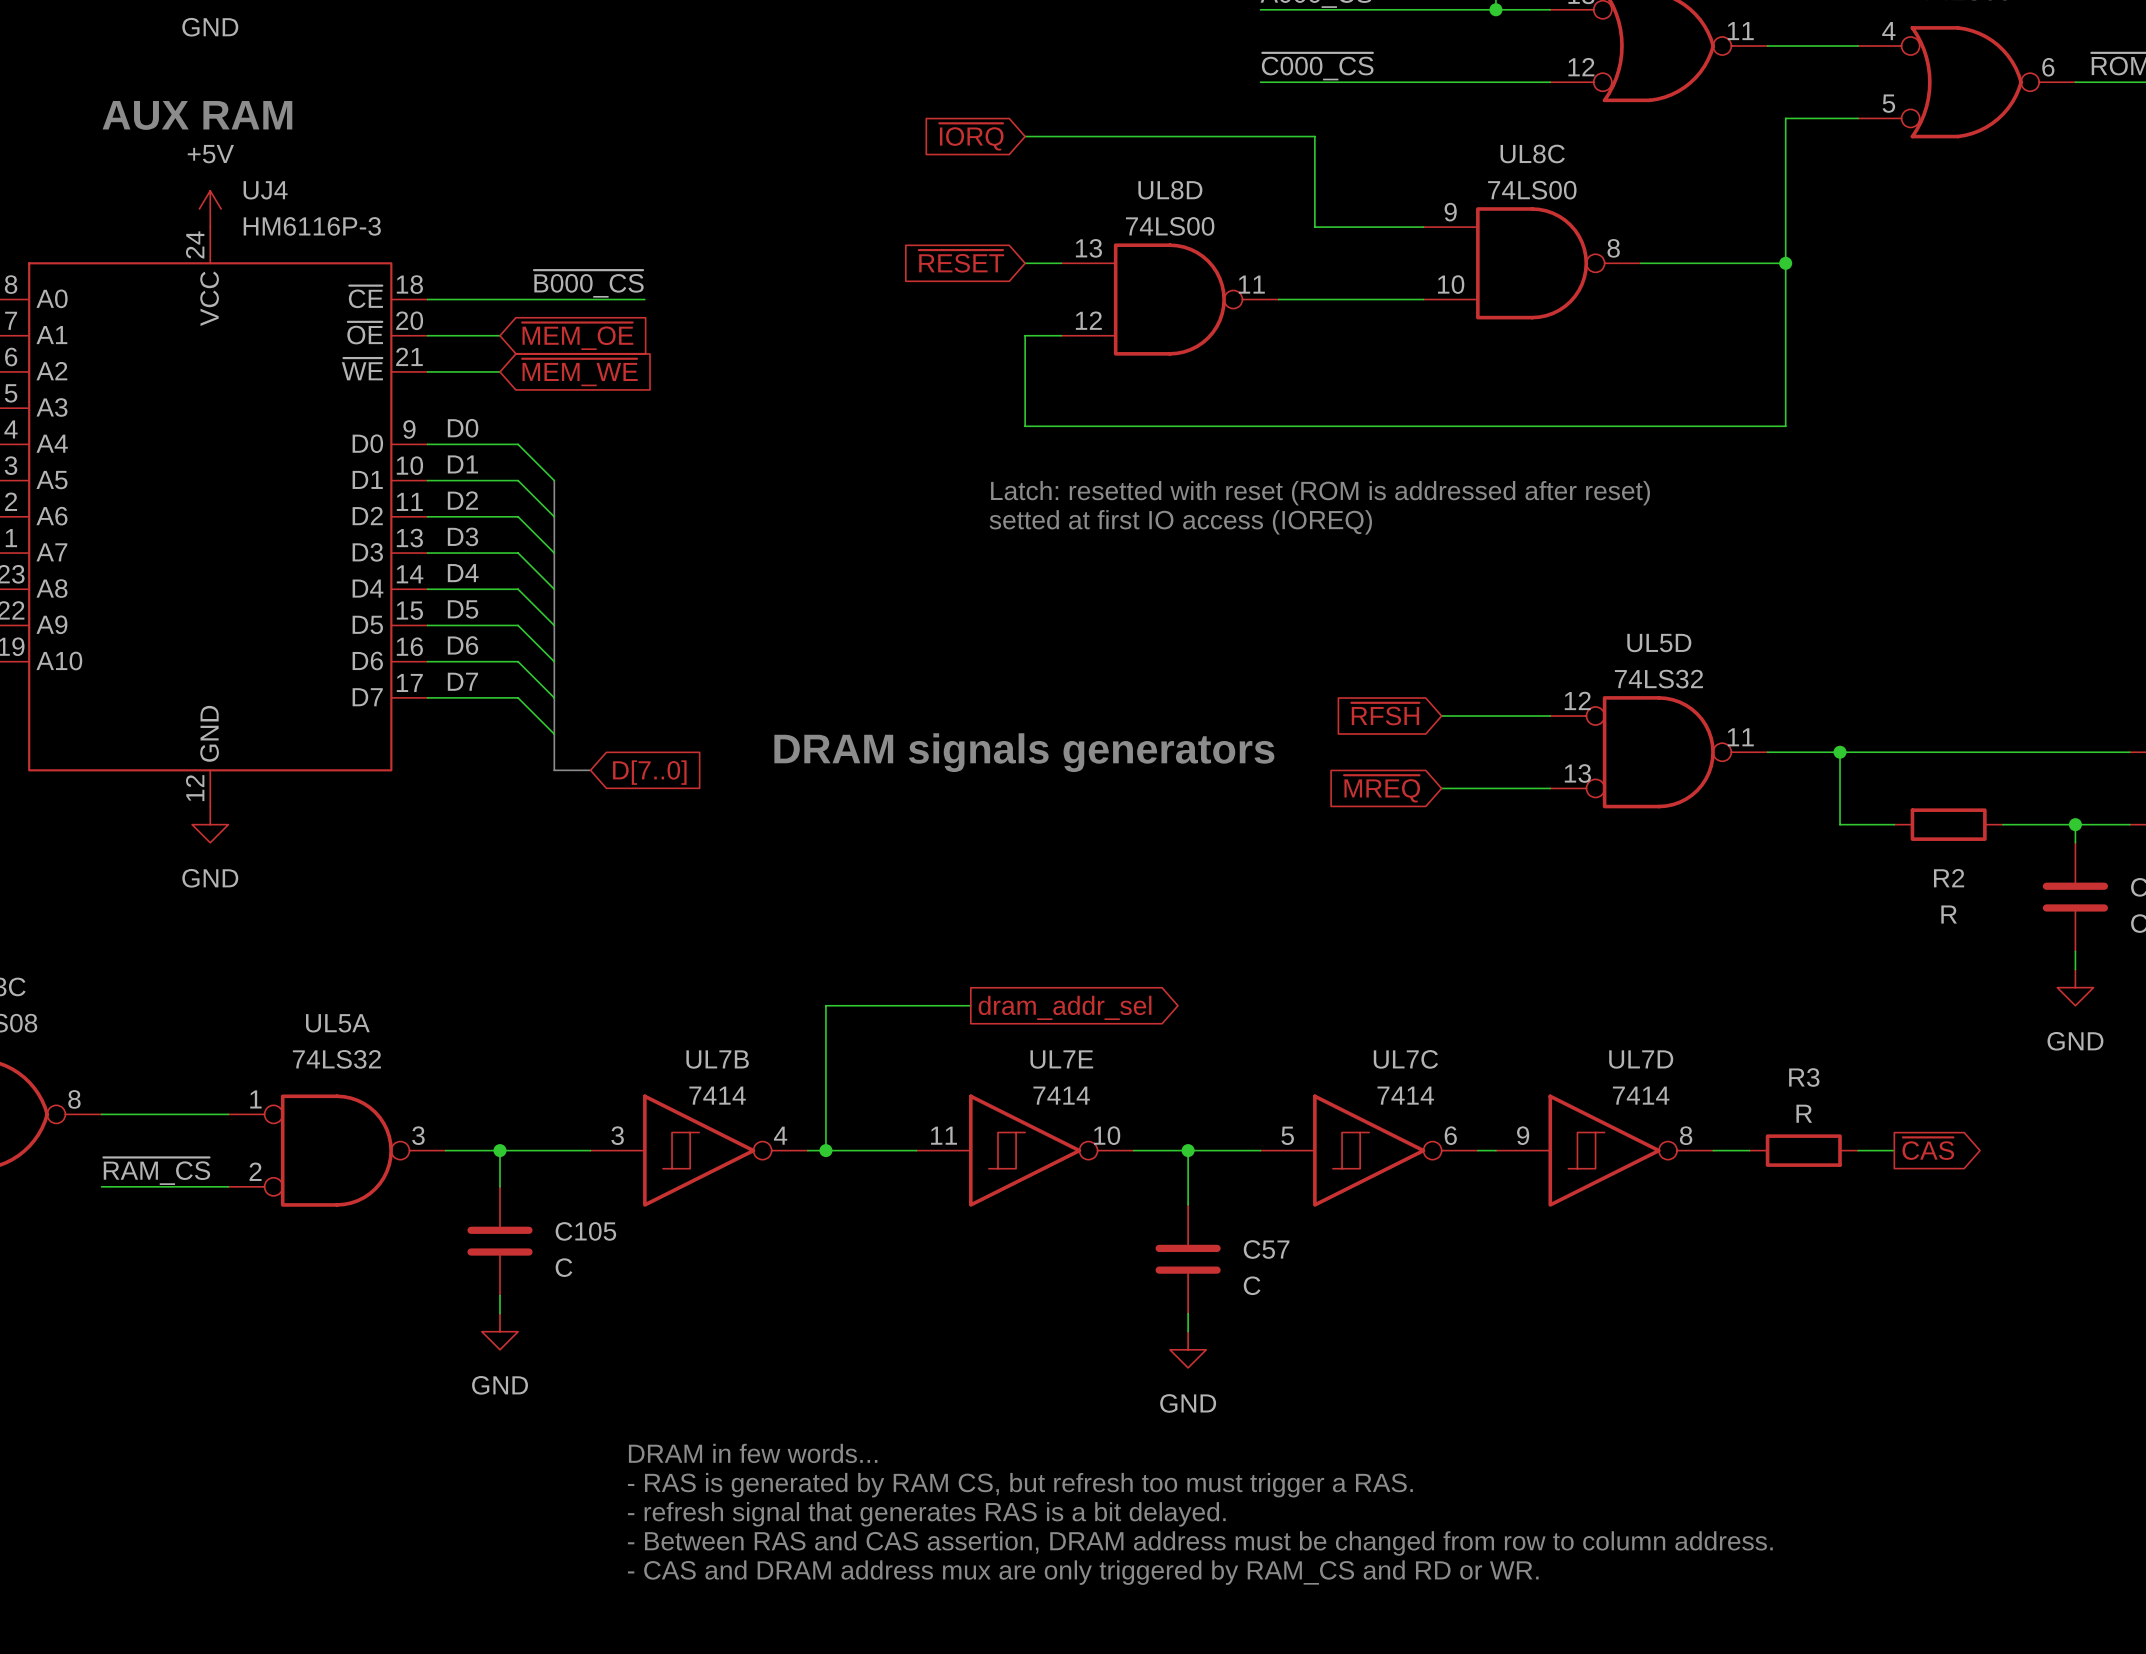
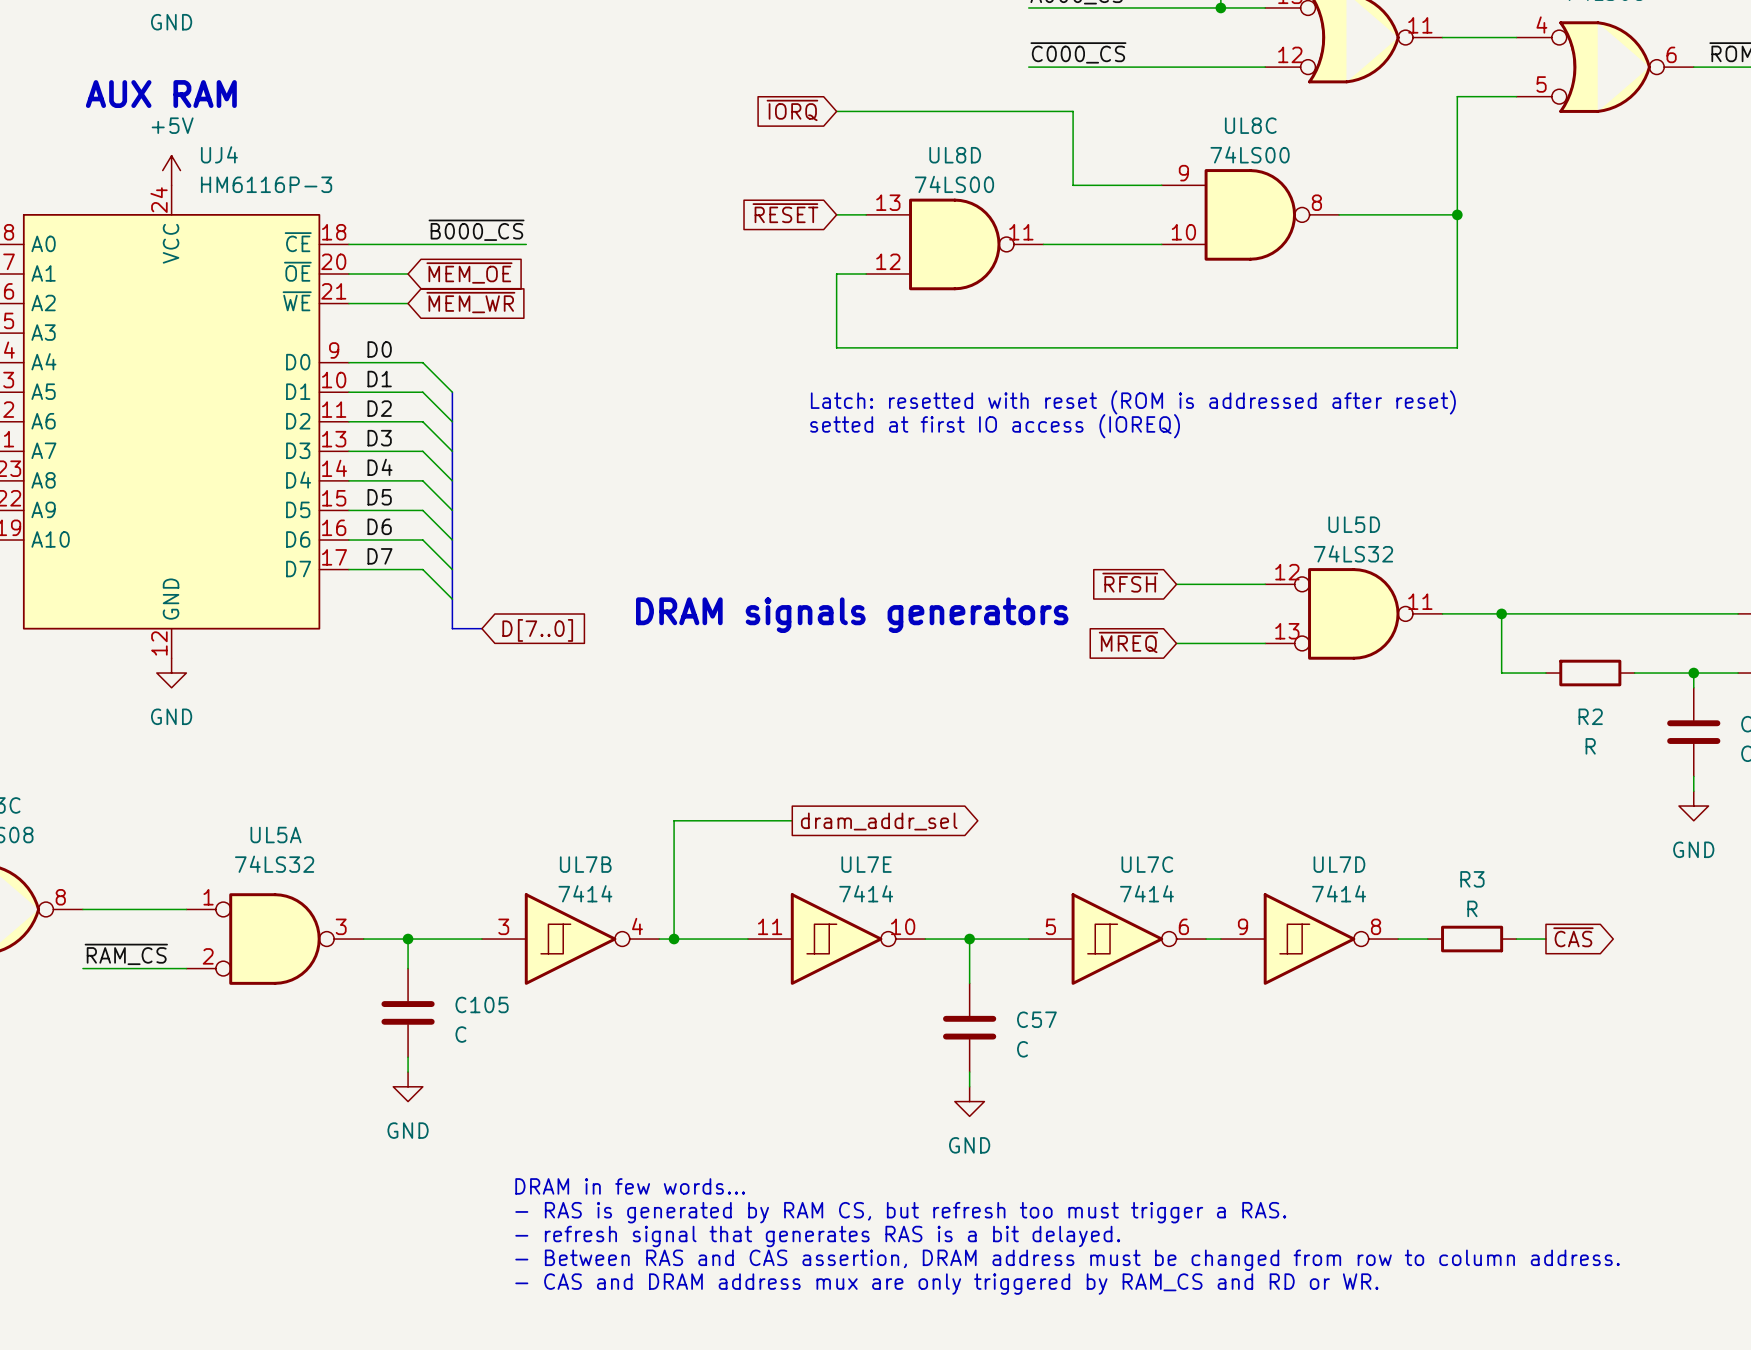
global label: ~{MEM_WE} (579, 372) -> ~{MEM_WR} (470, 302)

